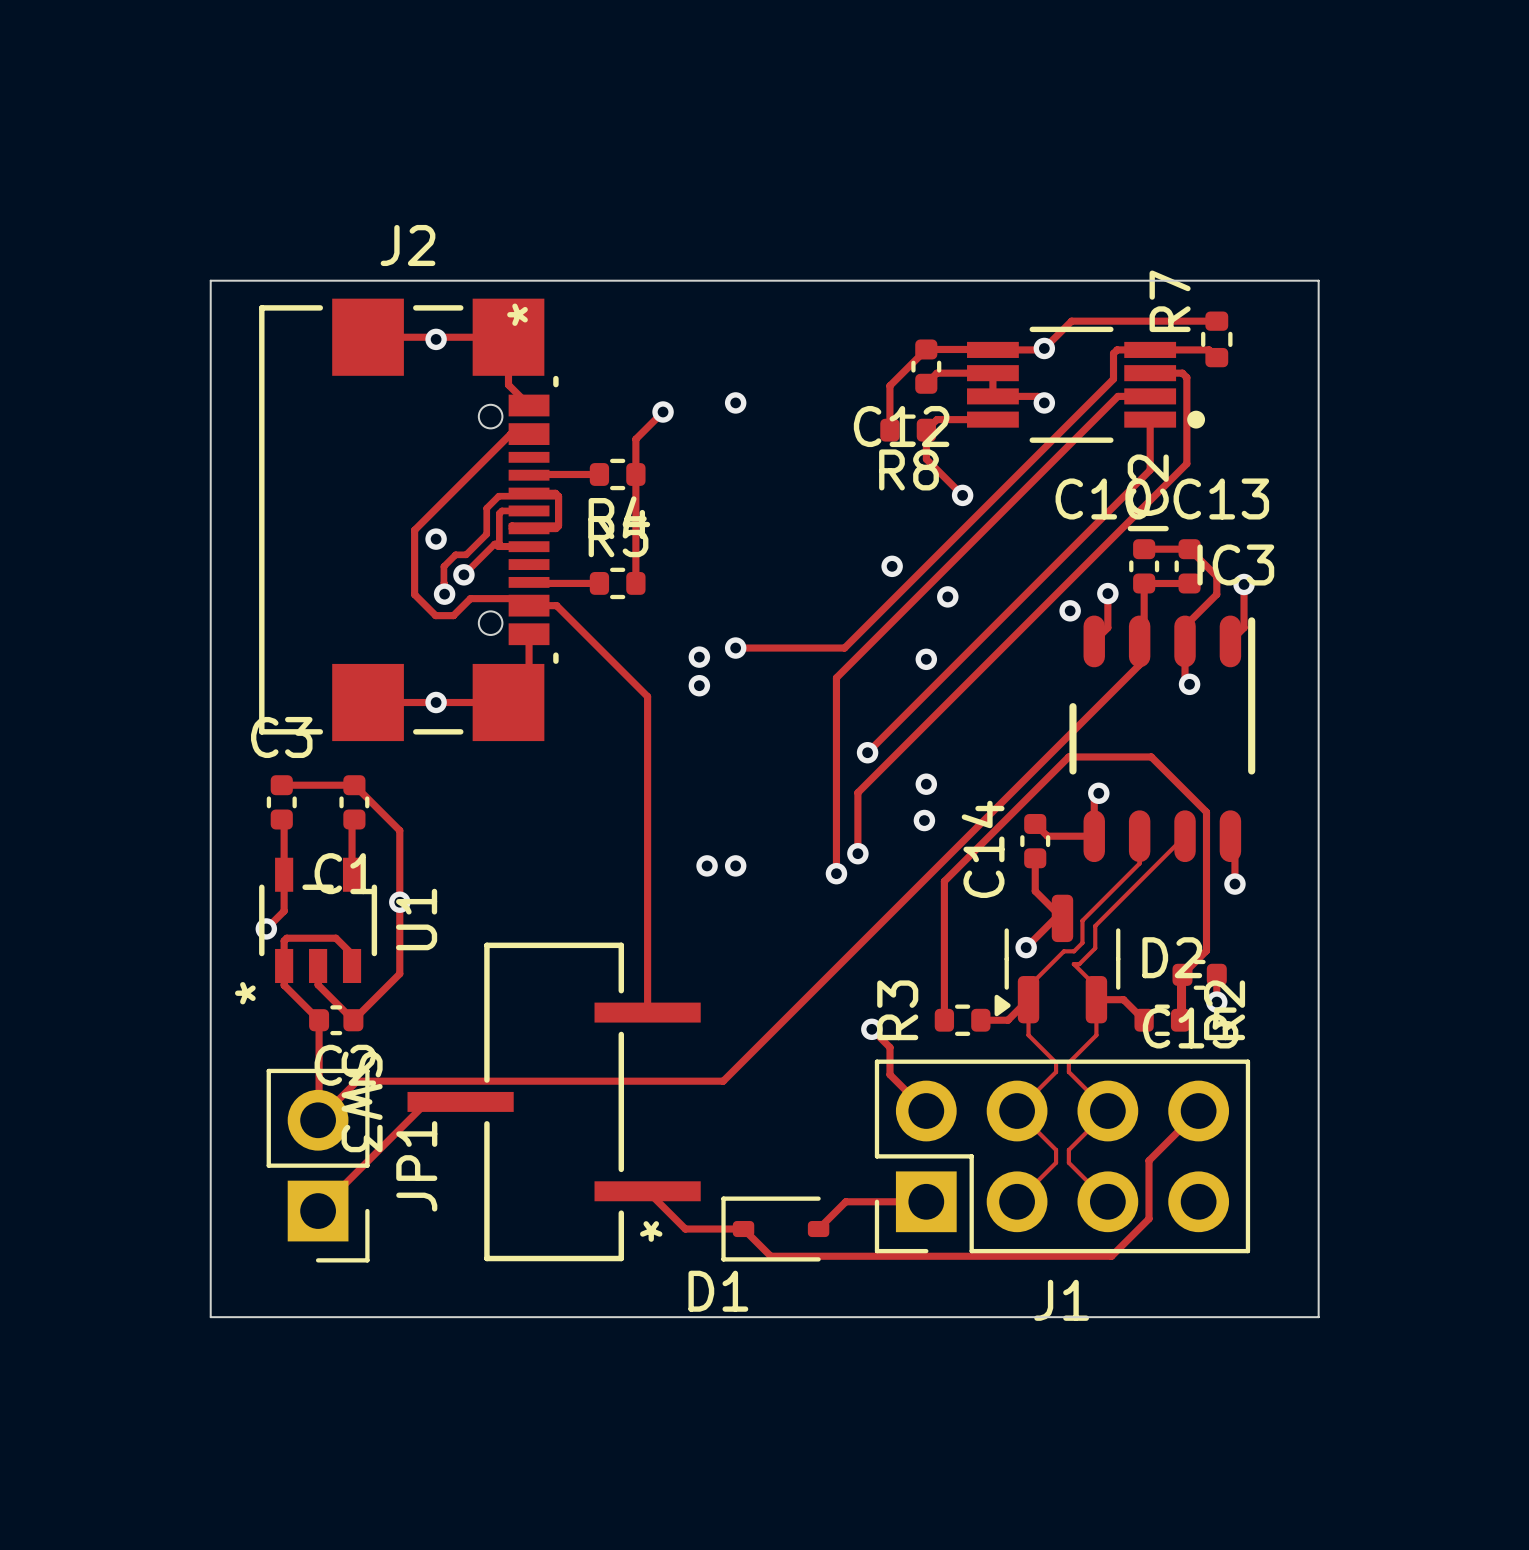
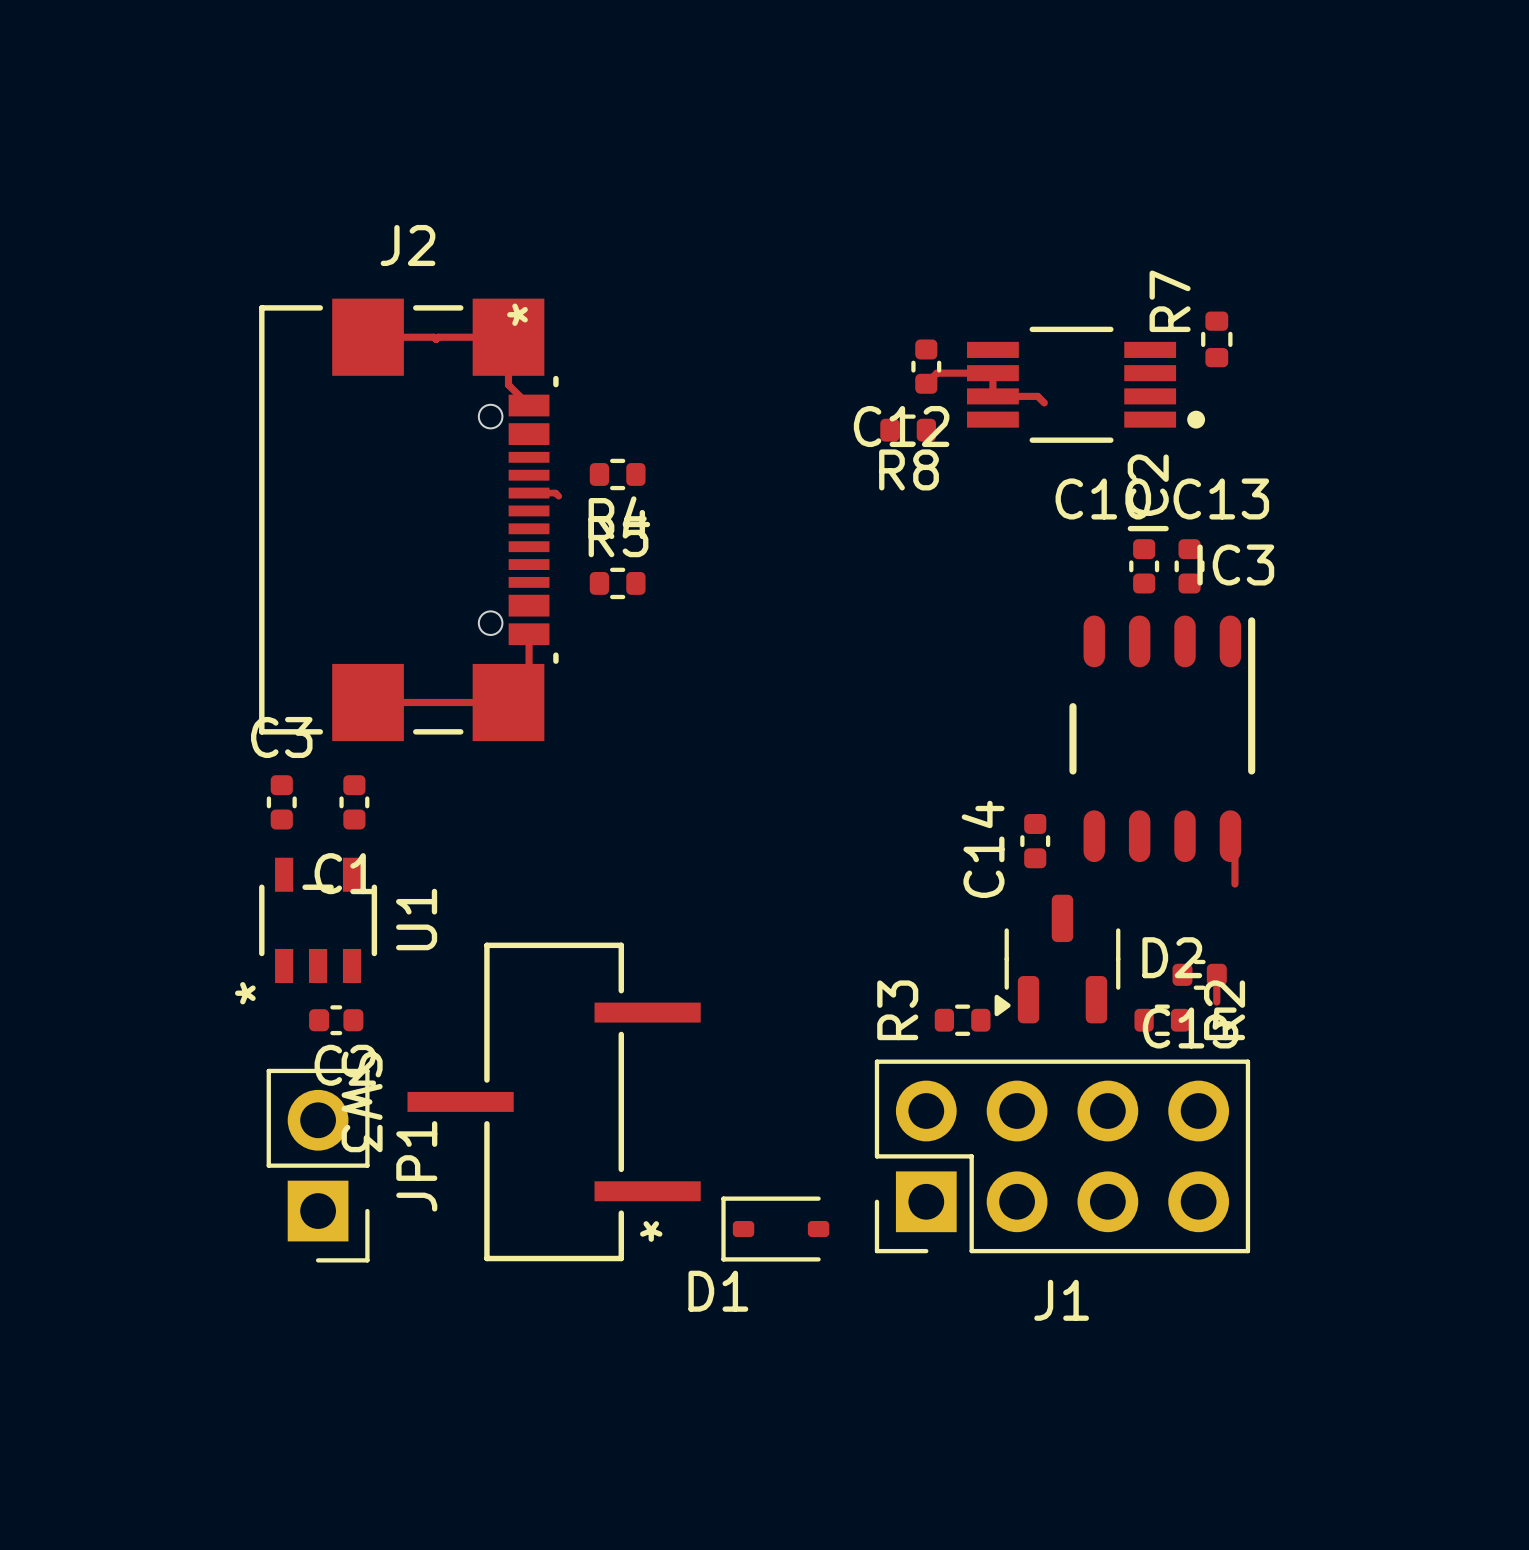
board edge: (210, 280) (1318, 280) (1318, 1317) (210, 1317) (210, 280) -> none
track: (1216, 321) (1071, 321) (1042, 349) (992, 349) -> none
via: (436, 339) -> none
via: (1044, 348) -> none
track: (992, 349) (926, 349) (889, 385) (889, 430) -> none
track: (1216, 357) (1209, 349) (1117, 349) (1113, 353) (1113, 379) (844, 648) (735, 648) -> none
track: (1150, 373) (1182, 373) (1186, 377) (1186, 463) (857, 792) (857, 853) -> none
track: (1150, 396) (1117, 396) (836, 677) (836, 873) -> none
via: (735, 402) -> none
via: (1044, 402) -> none
track: (663, 412) (635, 439) (635, 583) -> none
via: (663, 412) -> none
track: (992, 419) (936, 419) (926, 430) (926, 459) (962, 495) -> none
track: (1150, 419) (1150, 470) (867, 752) -> none
track: (529, 434) (510, 434) (414, 530) (414, 594) (435, 615) (453, 615) (470, 598) (522, 598) (529, 605) (556, 605) (647, 696) (647, 1012) -> none
track: (599, 474) (529, 475) -> none
via: (962, 495) -> none
track: (529, 510) (501, 510) (499, 513) (499, 544) (501, 546) -> none
track: (558, 525) (511, 525) (511, 528) (556, 528) (558, 526) (558, 496) (498, 496) (486, 508) (486, 534) (466, 554) (455, 554) (443, 566) (444, 594) -> none
via: (436, 539) -> none
track: (529, 546) (498, 546) (494, 544) (463, 574) -> none
track: (1144, 549) (1189, 549) (1216, 576) (1216, 594) (1185, 626) (1185, 679) (1189, 684) -> none
via: (892, 566) -> none
via: (463, 574) -> none
track: (529, 582) (599, 583) -> none
track: (1189, 583) (1144, 583) (1144, 636) (1139, 641) (1139, 664) (723, 1081) (357, 1081) (318, 1120) -> none
track: (1244, 584) (1244, 627) (1230, 641) -> none
via: (1244, 584) -> none
track: (1107, 593) (1107, 627) (1094, 641) -> none
via: (1107, 593) -> none
via: (444, 594) -> none
via: (947, 596) -> none
via: (1070, 610) -> none
via: (735, 648) -> none
via: (699, 657) -> none
via: (926, 659) -> none
via: (1189, 684) -> none
via: (699, 685) -> none
via: (436, 702) -> none
via: (867, 752) -> none
via: (926, 784) -> none
track: (281, 785) (354, 785) (399, 830) (399, 973) (353, 1020) (318, 984) (318, 965) -> none
track: (1098, 793) (1094, 797) (1094, 836) (1047, 836) (1035, 823) -> none
via: (1098, 793) -> none
track: (281, 819) (284, 821) (284, 911) (266, 928) -> none
track: (354, 819) (352, 821) (352, 874) -> none
via: (924, 820) -> none
track: (1139, 836) (1139, 863) (1082, 920) (1082, 942) (1074, 951) (1063, 951) (1028, 986) (1028, 1035) (1056, 1062) (1056, 1072) (1017, 1111) -> none
track: (1185, 836) (1095, 925) (1095, 948) (1079, 964) (1073, 964) (1096, 986) (1096, 1035) (1068, 1062) (1068, 1072) (1107, 1111) -> none
via: (857, 853) -> none
track: (1035, 858) (1035, 891) (1062, 918) (1055, 918) (1026, 947) -> none
via: (707, 865) -> none
via: (735, 865) -> none
via: (836, 873) -> none
via: (1234, 884) -> none
via: (399, 902) -> none
via: (266, 928) -> none
via: (1026, 947) -> none
track: (352, 965) (352, 954) (335, 938) (286, 938) (284, 940) (284, 985) (319, 1020) (319, 1119) -> none
track: (1180, 975) (1180, 1020) (1182, 1018) (1182, 974) (1206, 950) (1206, 812) (1151, 756) (1068, 756) (944, 881) (944, 1020) -> none
track: (1028, 999) (1007, 1020) (980, 1020) -> none
via: (1216, 1002) -> none
track: (1096, 1008) (1096, 999) (1123, 999) (1144, 1020) -> none
track: (871, 1029) (889, 1047) (889, 1074) (926, 1111) -> none
via: (871, 1029) -> none
track: (460, 1101) (427, 1101) (318, 1211) -> none
track: (1017, 1111) (1056, 1150) (1056, 1162) (1017, 1201) -> none
track: (1107, 1111) (1068, 1150) (1068, 1162) (1107, 1201) -> none
track: (1198, 1111) (1149, 1160) (1149, 1218) (1111, 1256) (770, 1256) (743, 1229) (685, 1229) (647, 1191) -> none
track: (926, 1201) (845, 1201) (818, 1229) -> none

